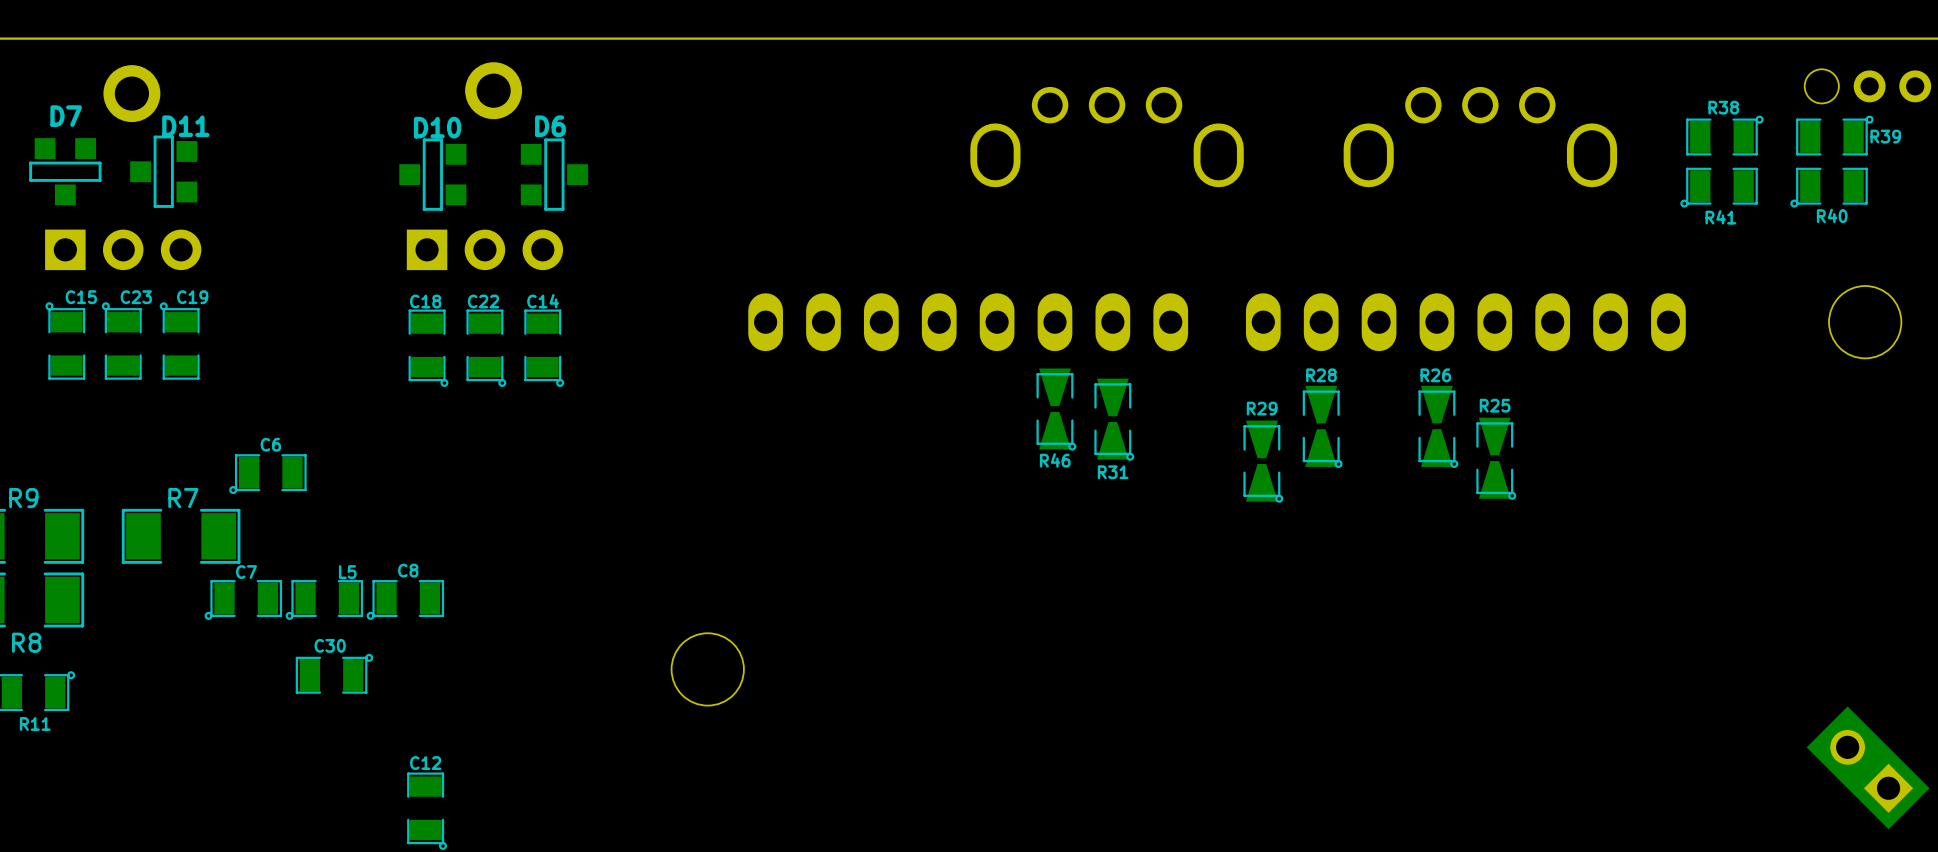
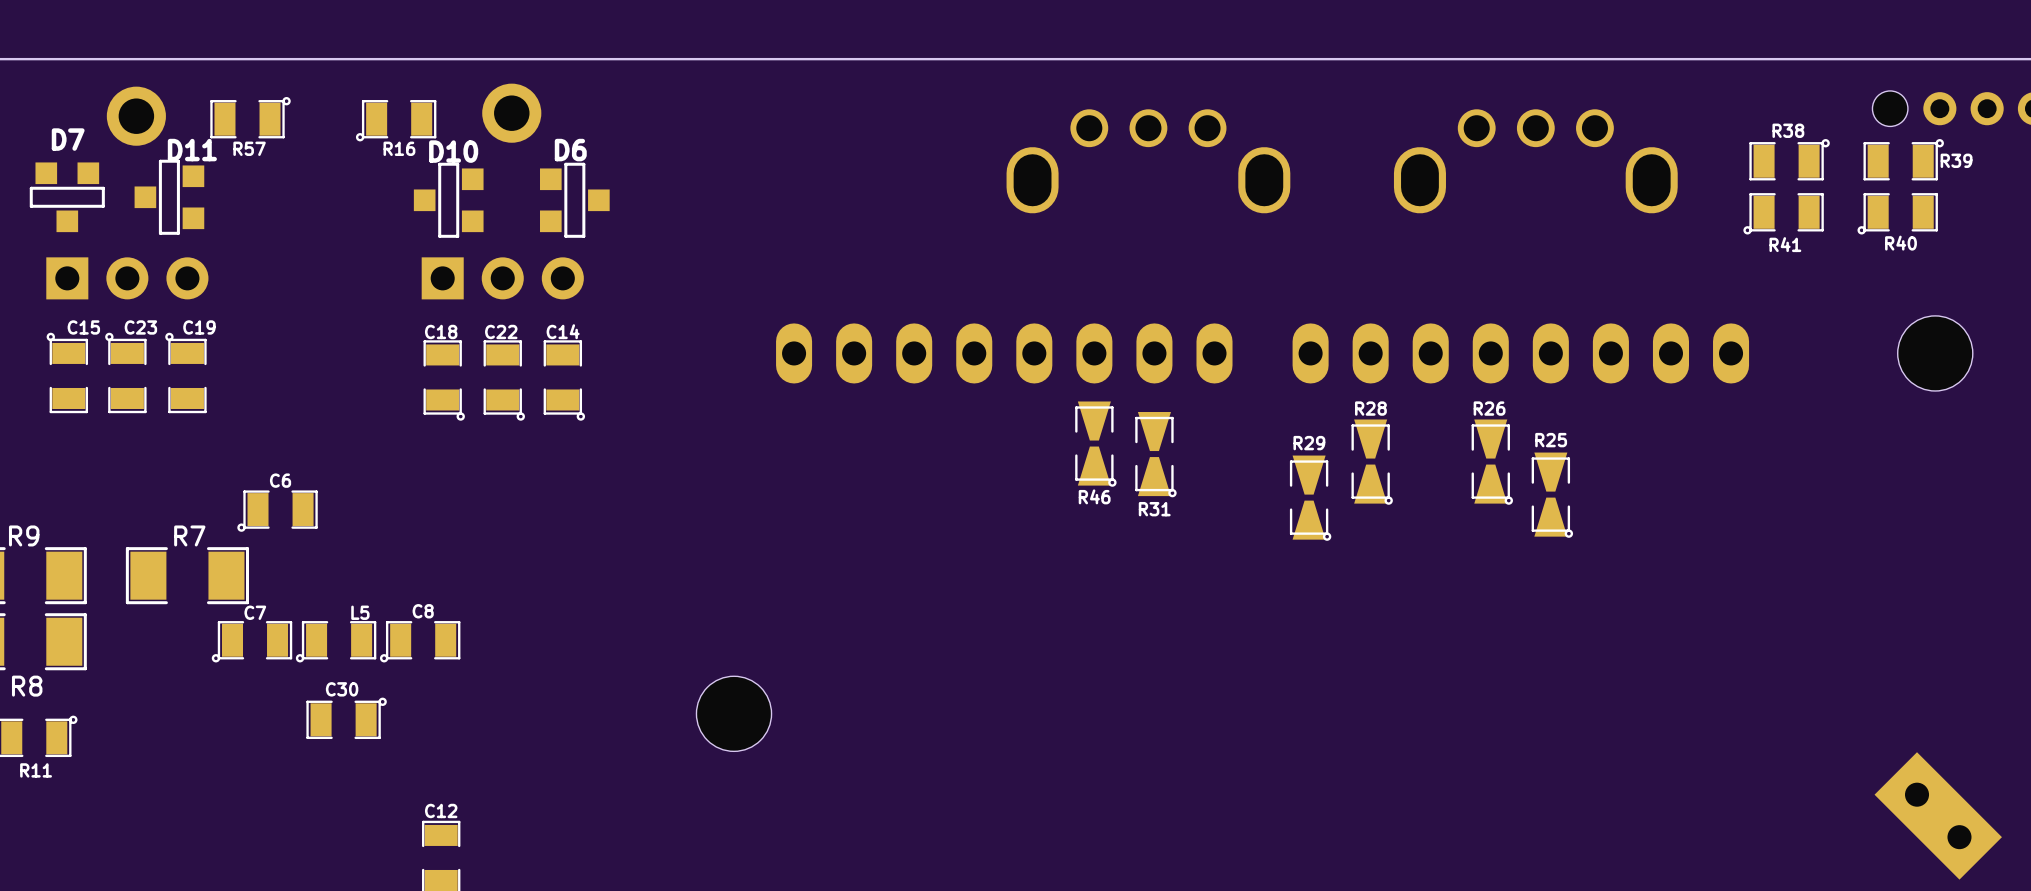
R57: none -> (250, 117)
R16: none -> (396, 120)

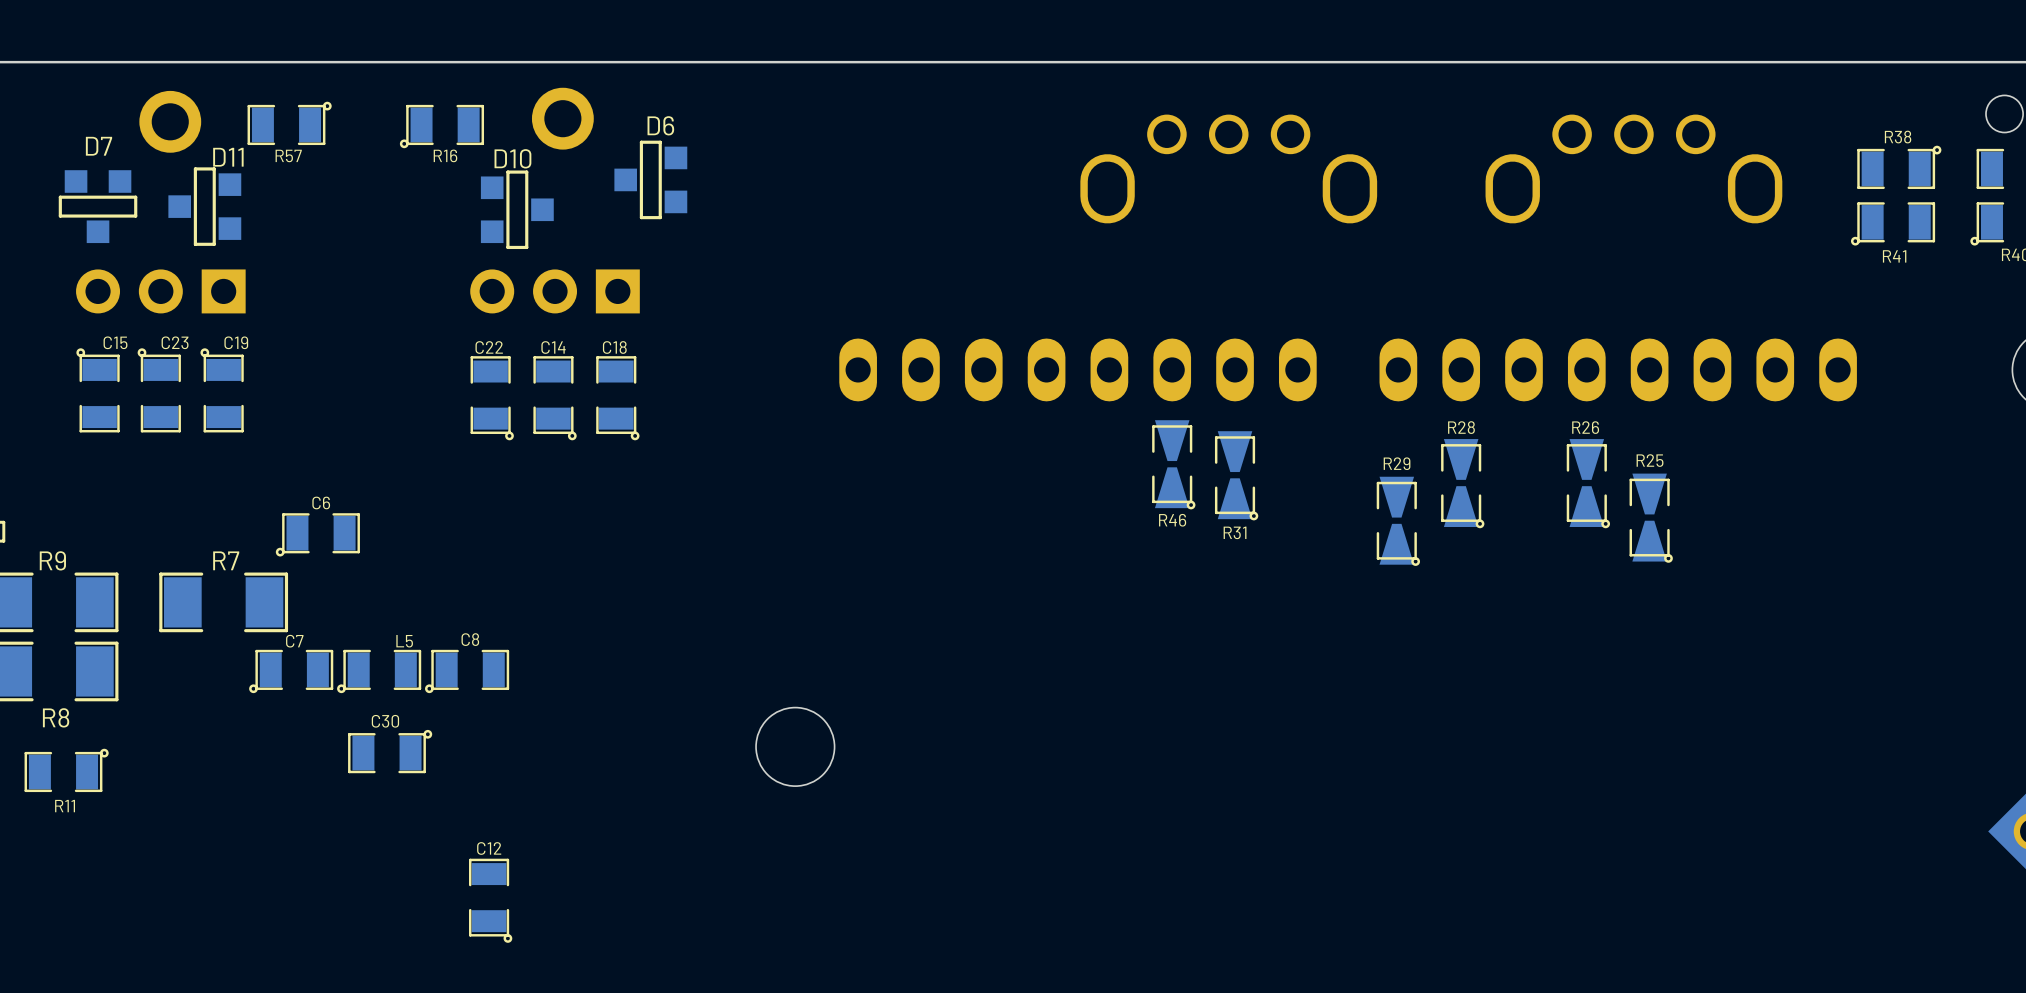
D10 rotation: 0° (448, 200) -> 180° (517, 209)
D6 rotation: 0° (574, 200) -> 180° (650, 179)
part rotation: 0° (127, 278) -> 180° (160, 291)
part rotation: 0° (502, 278) -> 180° (555, 291)
C18 name: C18 (441, 331) -> C22 (489, 347)
C22 name: C22 (501, 331) -> C14 (553, 347)
C14 name: C14 (563, 331) -> C18 (614, 347)

